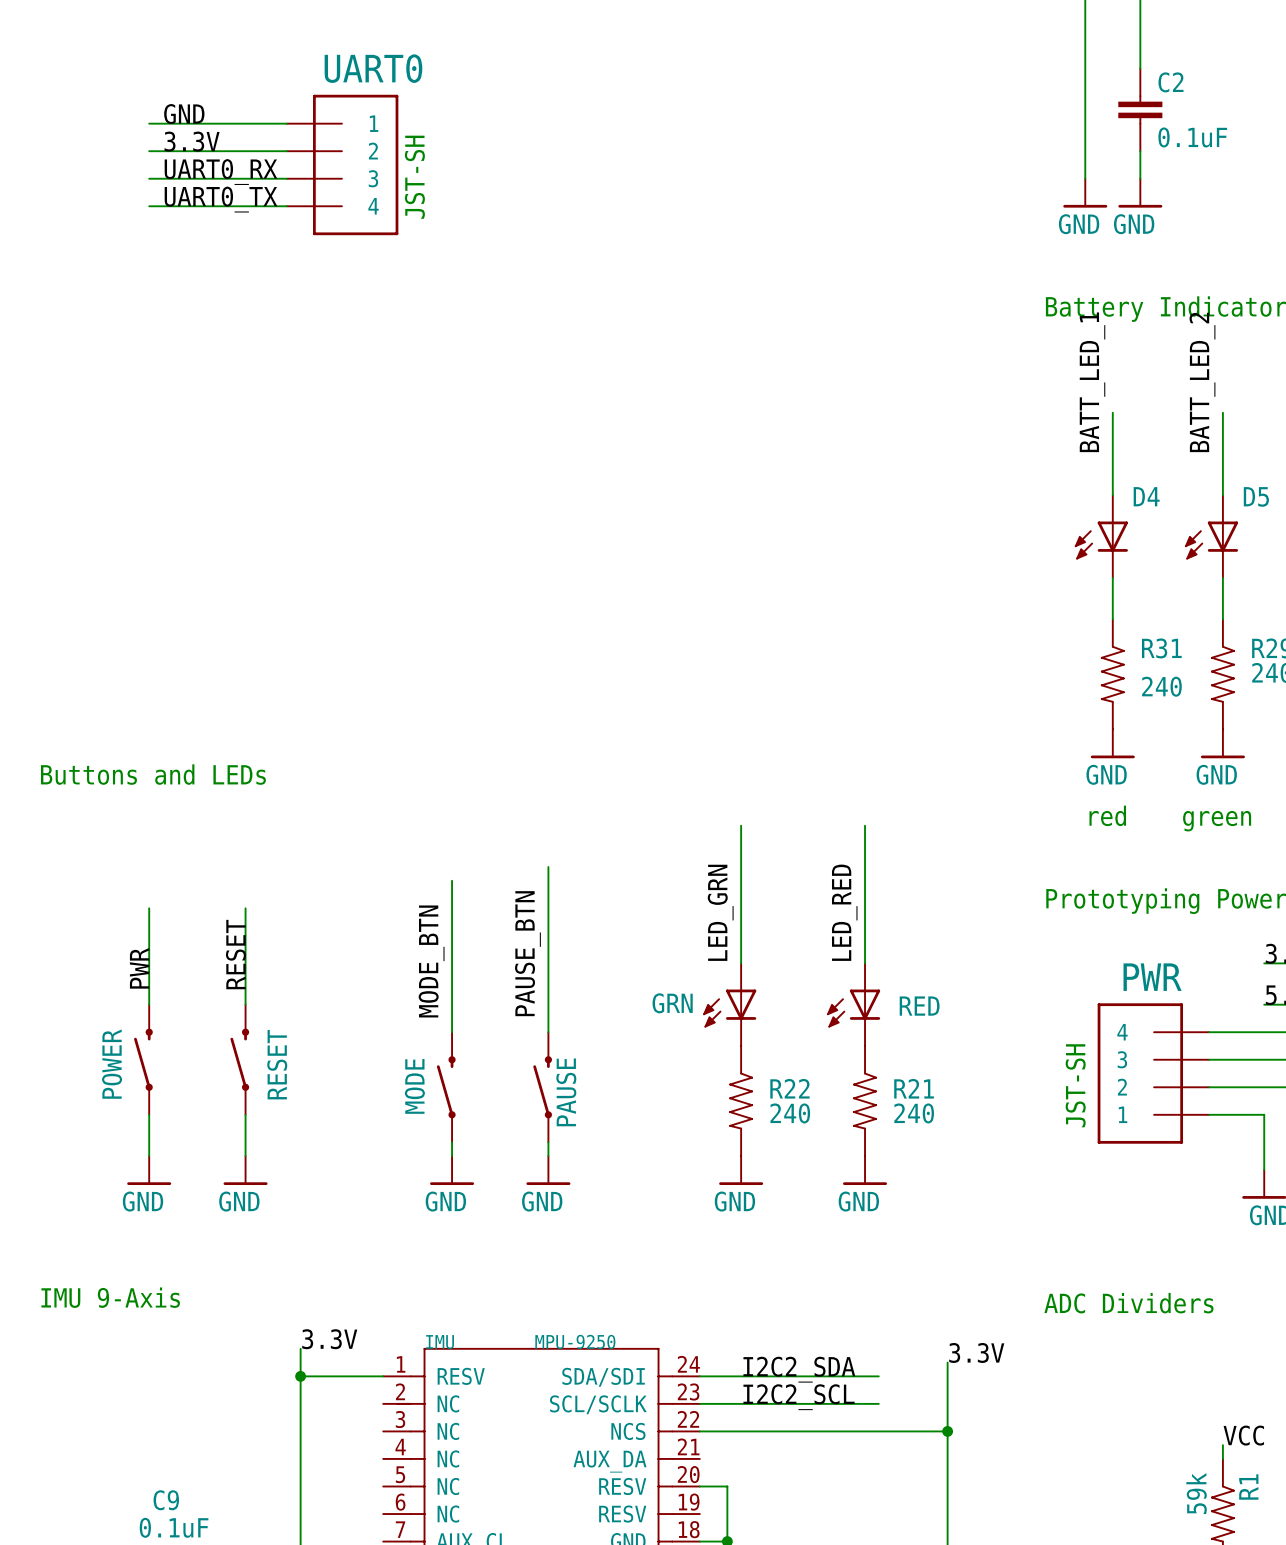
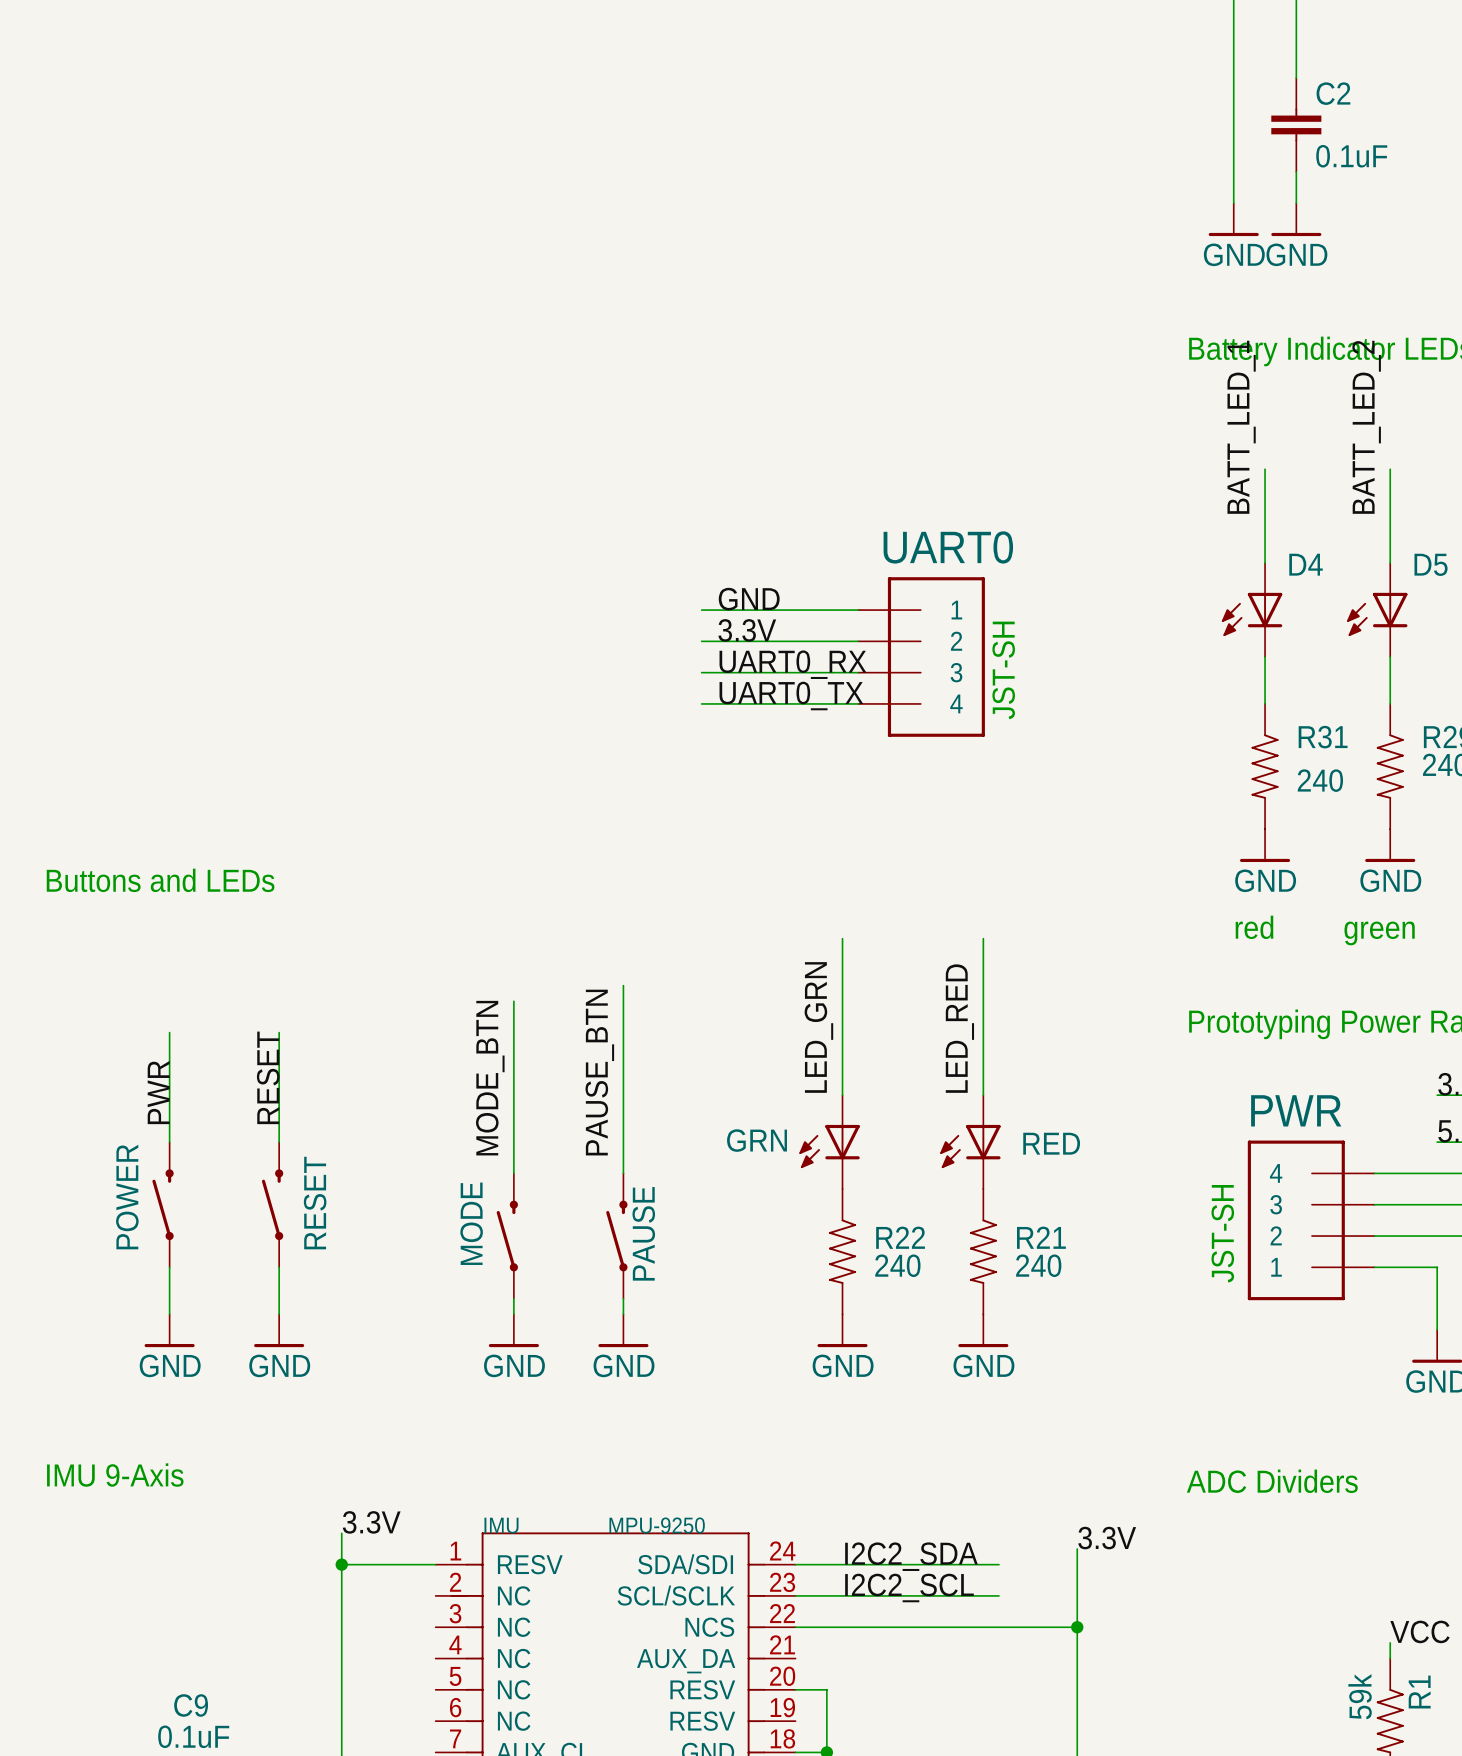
label: GND (184, 114) -> none
wire: (149, 123) (286, 123) -> none
label: 3.3V (192, 141) -> none
wire: (149, 151) (286, 151) -> none
UART0 position: (342, 164) -> (921, 657)
label: UART0_RX (221, 172) -> none
text: JST-SH (414, 177) -> none
wire: (149, 178) (286, 178) -> none
label: UART0_TX (221, 199) -> none
wire: (149, 206) (286, 206) -> none
label: none -> GND (749, 599)
wire: none -> (701, 610) (858, 610)
label: none -> 3.3V (747, 630)
wire: none -> (701, 641) (858, 641)
label: none -> UART0_RX (792, 664)
text: none -> JST-SH (1003, 670)
wire: none -> (701, 672) (858, 672)
label: none -> UART0_TX (791, 696)
wire: none -> (701, 703) (858, 703)

